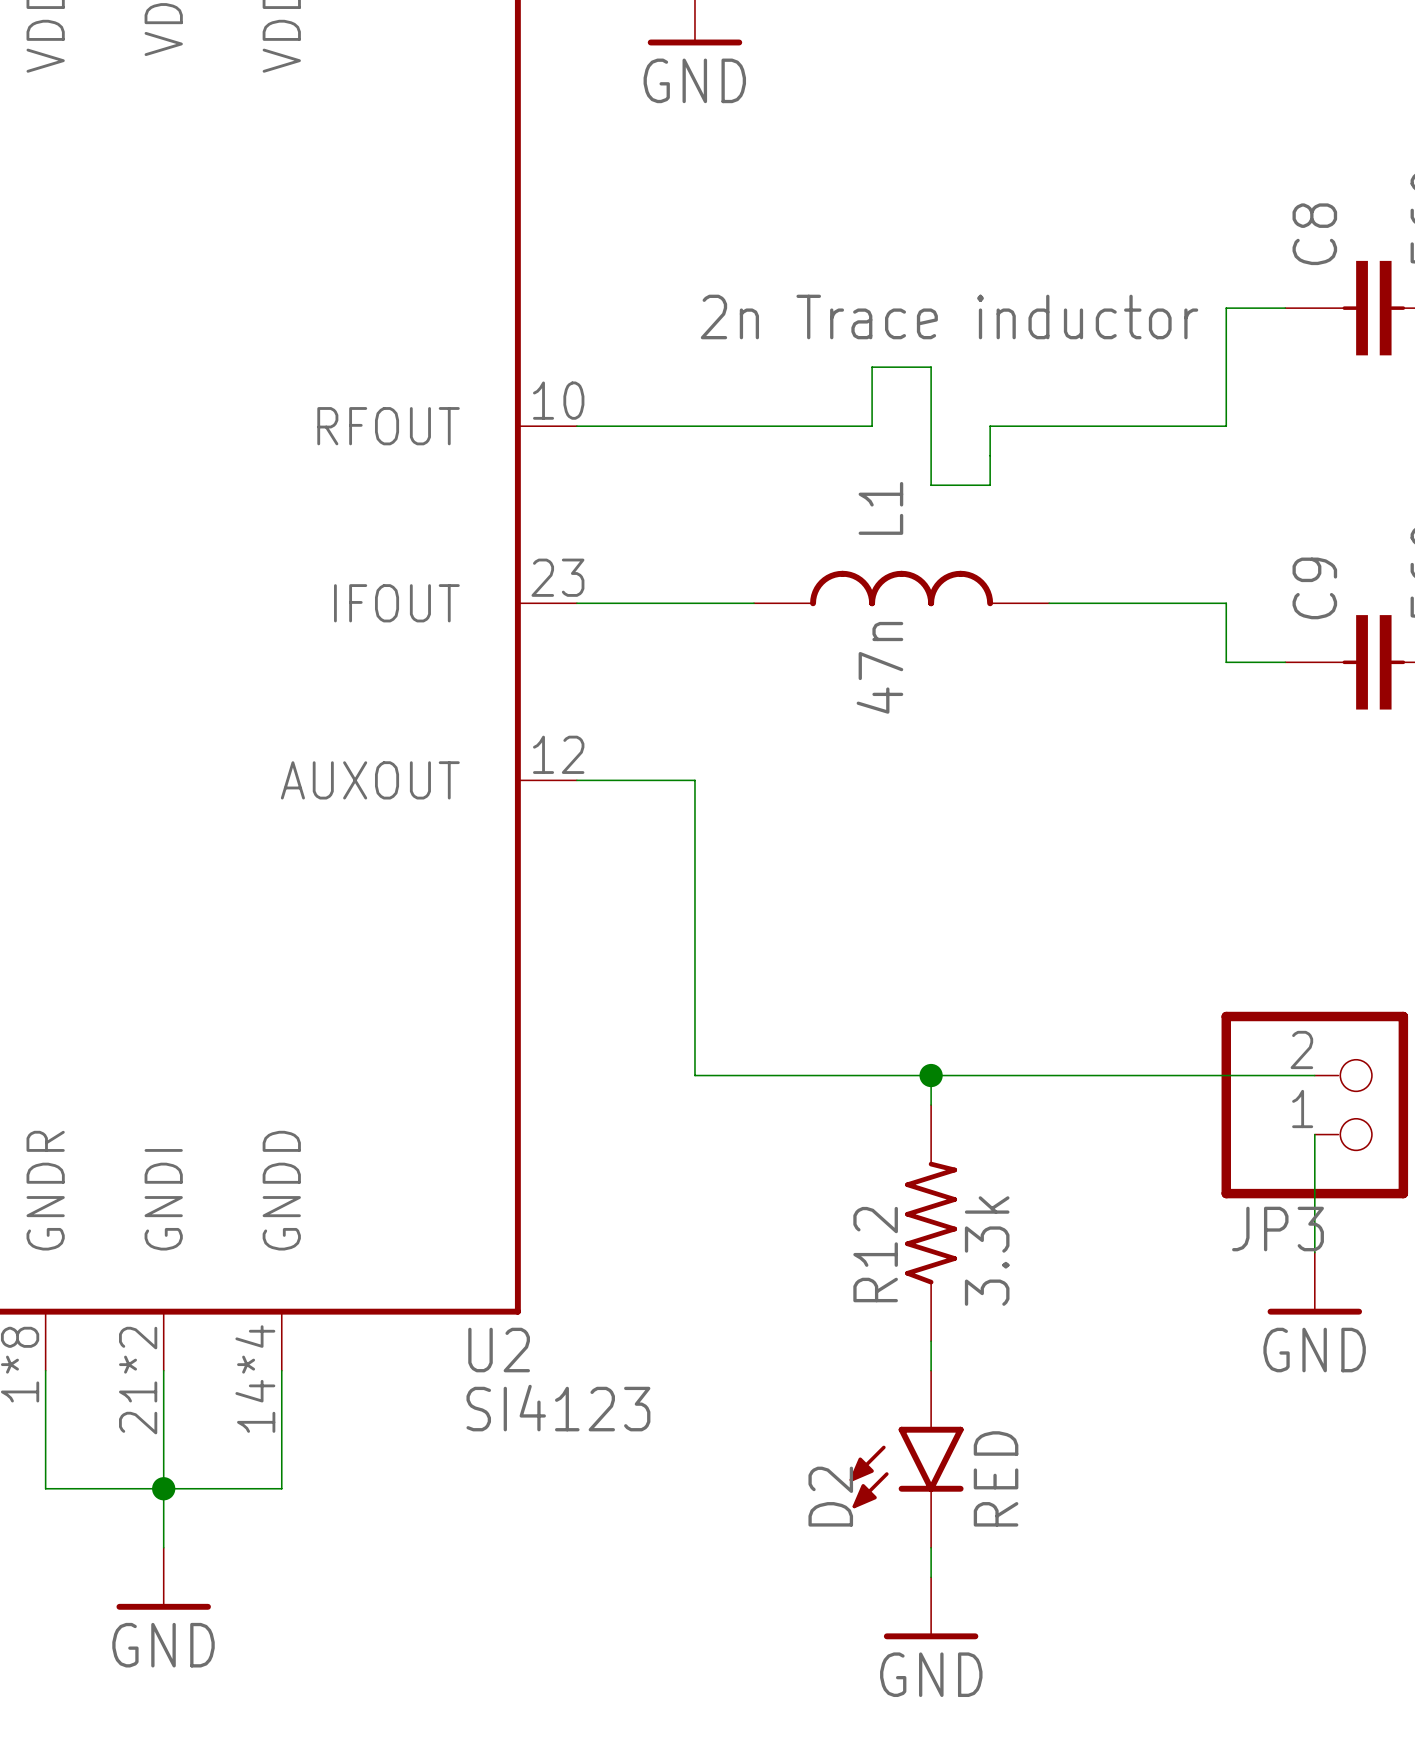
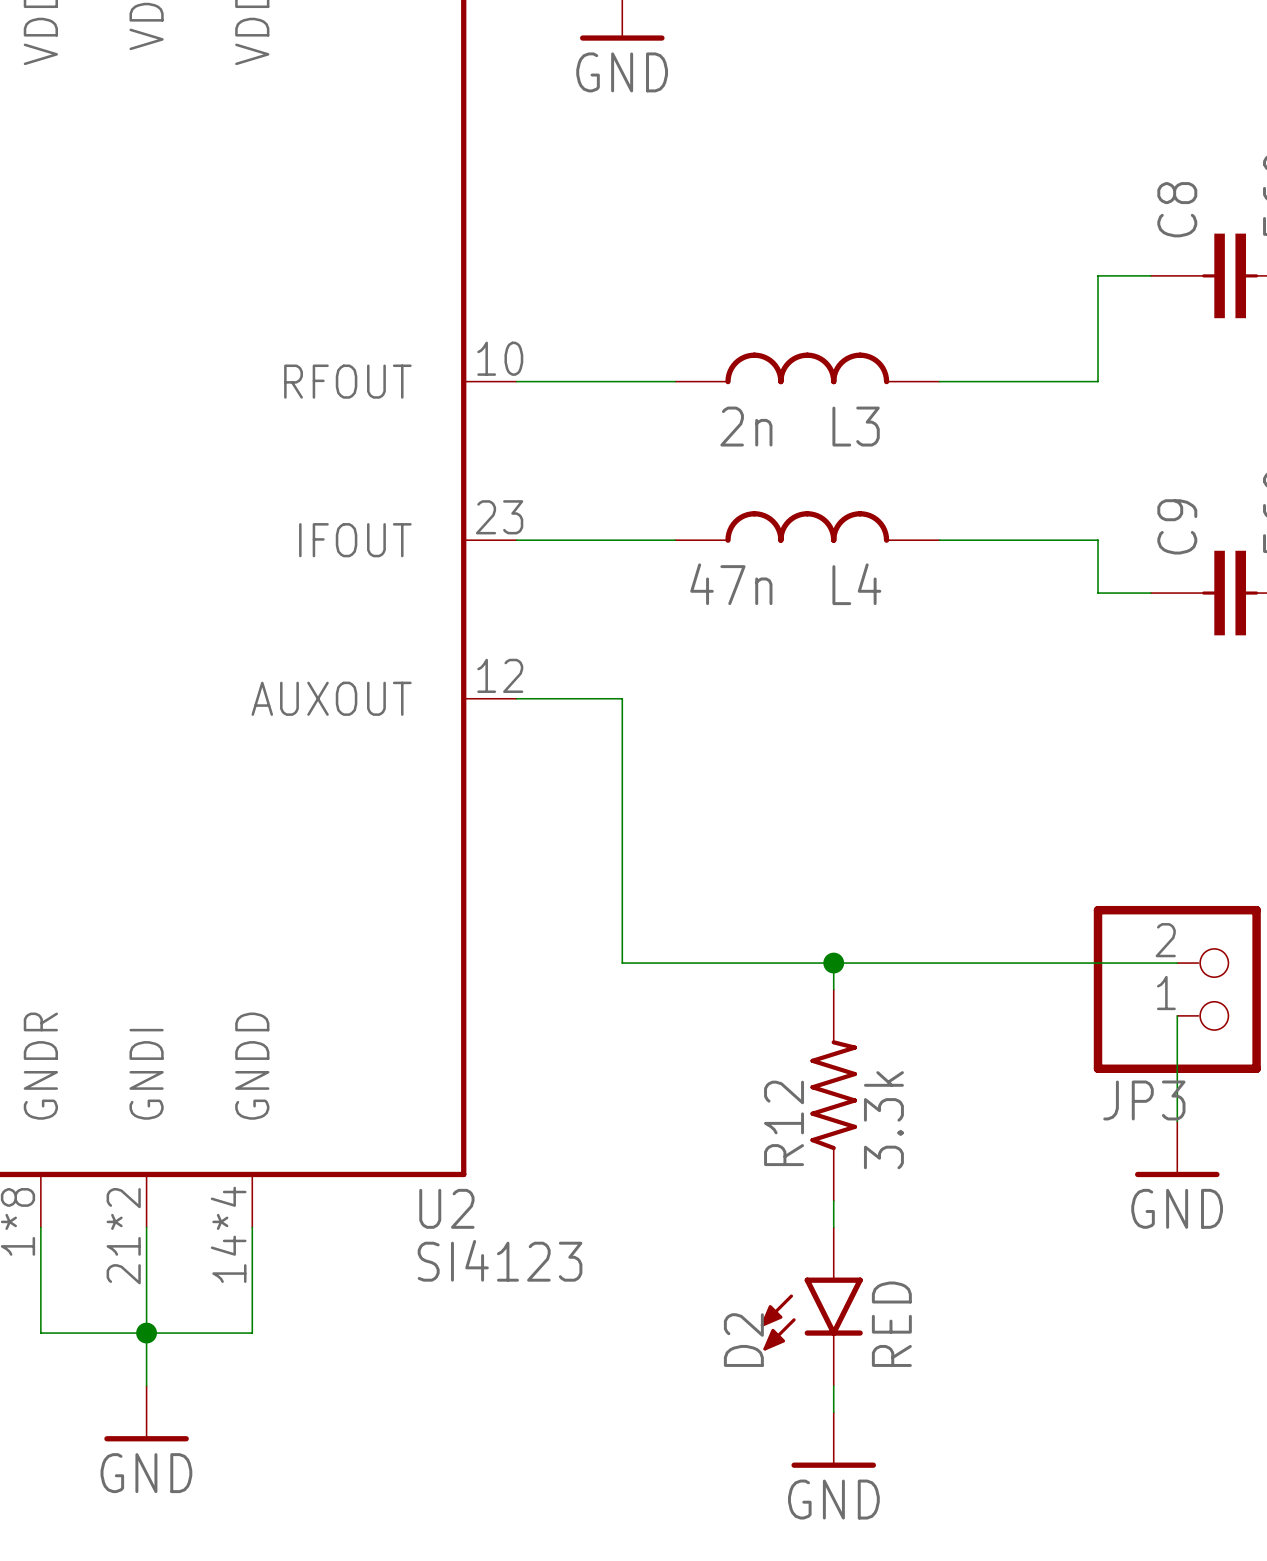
text: 2n Trace inductor (949, 316) -> none
L3: none -> 2n (807, 368)
wire: (754, 426) (872, 426) (872, 367) (931, 367) (931, 485) (990, 485) (990, 426) (1049, 426) -> none
L1 name: L1 (880, 508) -> L4 (856, 584)
L1 value rotation: 0° (879, 667) -> 90° clockwise (731, 584)

